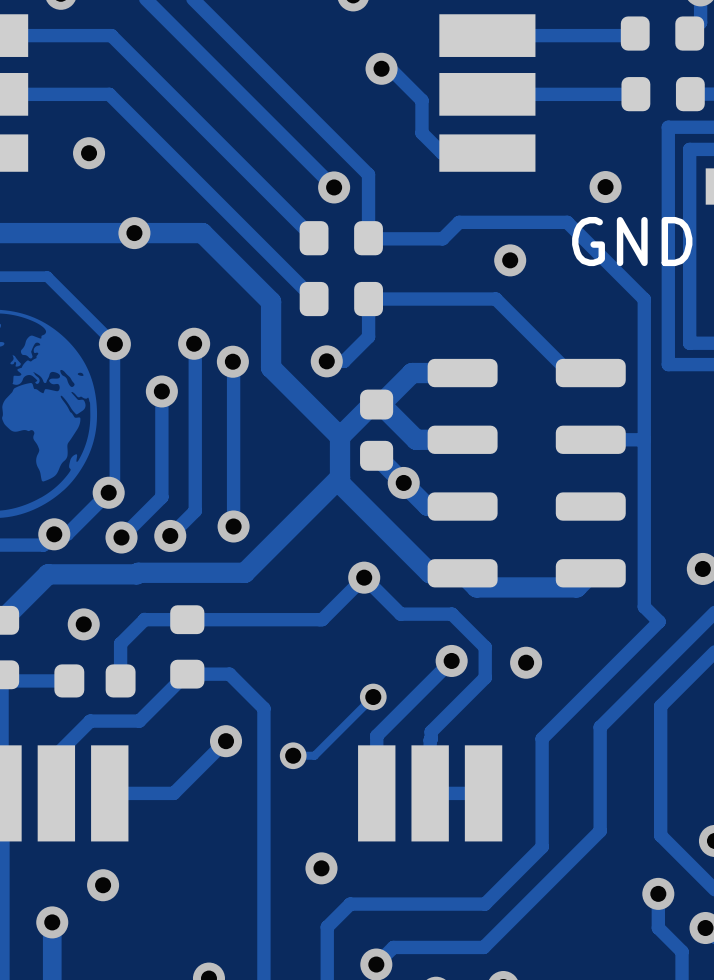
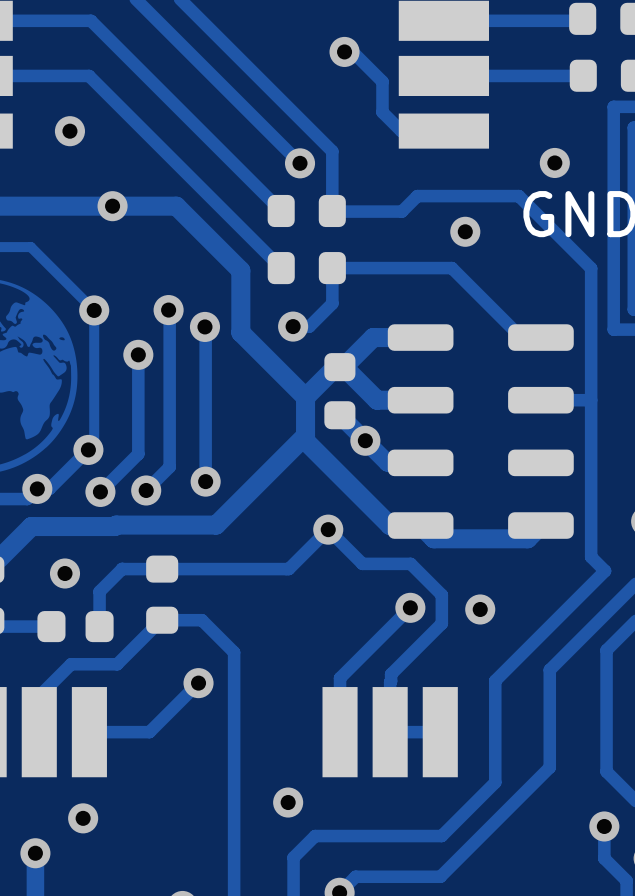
track: (373, 697) (314, 755) (293, 755) -> none
via: (373, 697) -> none
via: (293, 755) -> none

